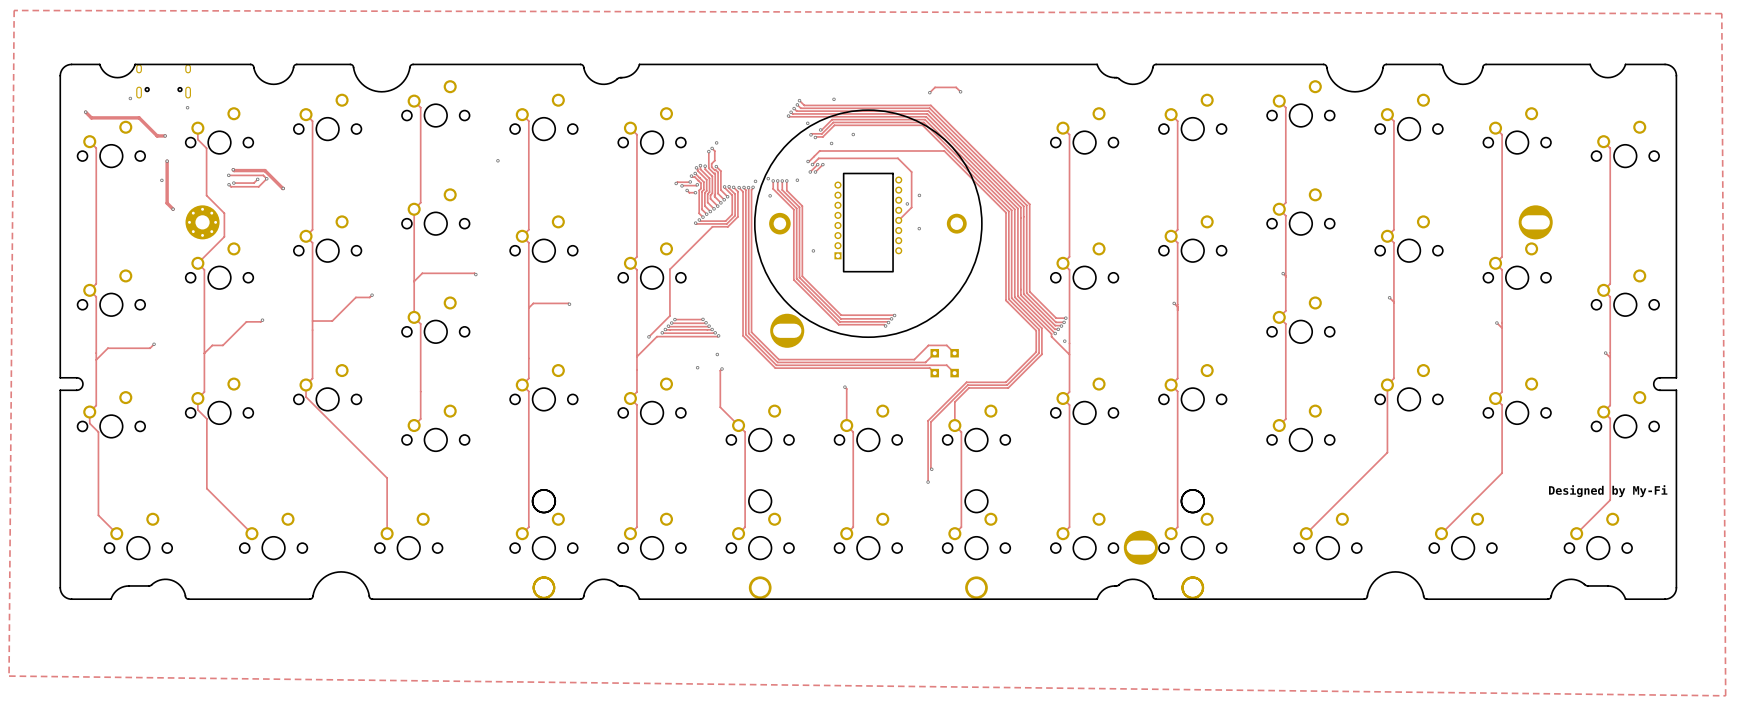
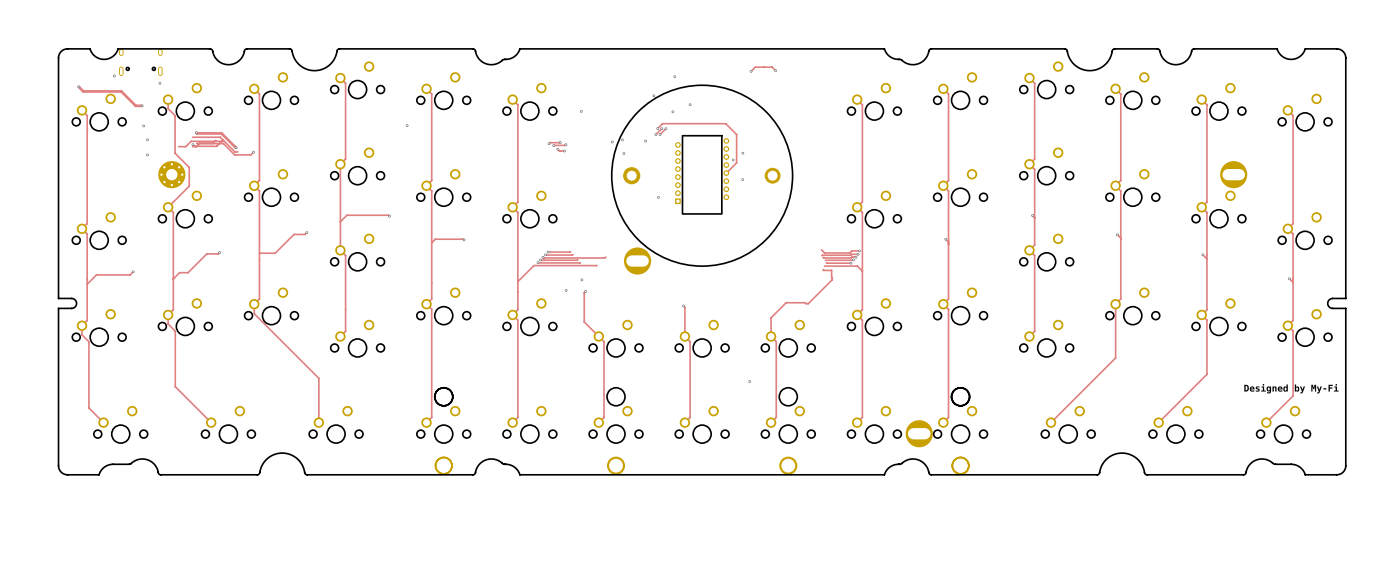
zone outline: (14, 10) (9, 676) (1725, 695) (1721, 13) (14, 10) -> none
track: (799, 100) (804, 105) (930, 105) (1029, 204) (1029, 291) (1056, 318) -> (821, 249) (824, 253) (849, 253) (851, 250)
via: (799, 100) -> none
track: (797, 104) (800, 108) (929, 108) (1026, 205) (1026, 293) (1056, 322) -> (821, 255) (851, 254)
via: (797, 104) -> none
track: (794, 108) (796, 111) (928, 111) (1023, 206) (1023, 294) (1056, 325) -> (823, 257) (852, 256)
via: (794, 108) -> none
track: (791, 112) (792, 113) (927, 113) (1020, 207) (1020, 295) (1054, 329) (1058, 329) -> (825, 260) (853, 259)
via: (791, 112) -> none
track: (788, 116) (926, 116) (1017, 208) (1017, 296) (1055, 333) -> (826, 262) (850, 263)
via: (788, 116) -> none
track: (820, 129) (832, 119) (925, 119) (1014, 209) (1014, 297) (1069, 354) -> none
via: (820, 129) -> none
track: (810, 134) (821, 133) (833, 122) (923, 122) (1011, 210) (1011, 298) (1041, 328) (1041, 354) (1008, 387) (968, 387) -> (822, 269) (831, 270) (832, 279) (808, 303) (786, 302) (782, 306)
via: (810, 134) -> none
track: (815, 137) (822, 136) (834, 125) (922, 125) (1008, 211) (1008, 299) (1039, 329) (1039, 353) (1007, 385) (967, 385) (930, 422) (931, 469) -> none
via: (815, 137) -> none
track: (712, 148) (714, 151) (714, 160) (711, 167) (718, 172) (718, 193) (724, 199) -> none
via: (712, 148) -> none
track: (708, 151) (708, 168) (715, 173) (714, 196) (720, 202) -> none
via: (708, 151) -> none
track: (167, 161) (167, 203) (173, 209) -> none
track: (808, 161) (819, 150) (944, 150) (1006, 212) (1006, 300) (1036, 330) (1036, 352) (1005, 382) (966, 382) (928, 420) (928, 482) -> none
via: (808, 161) -> none
track: (700, 165) (700, 169) (709, 178) (707, 202) (714, 208) -> none
via: (700, 165) -> none
track: (705, 166) (705, 169) (712, 176) (710, 198) (717, 206) -> none
via: (705, 166) -> none
track: (716, 166) (720, 171) (720, 190) (727, 196) -> none
via: (716, 166) -> none
track: (696, 167) (706, 179) (704, 206) (710, 211) -> none
via: (696, 167) -> none
track: (695, 173) (703, 182) (702, 209) (706, 214) -> none
via: (695, 173) -> none
via: (228, 175) -> none
track: (691, 176) (701, 183) (699, 213) (702, 217) -> none
via: (691, 176) -> none
via: none -> (147, 139)
via: (266, 178) -> none
via: (257, 179) -> none
via: (161, 180) -> none
track: (773, 180) (773, 188) (793, 209) (793, 279) (838, 324) (885, 326) -> none
via: (773, 180) -> none
track: (777, 180) (777, 189) (796, 208) (796, 278) (839, 321) (888, 322) -> none
via: (777, 180) -> none
track: (782, 180) (782, 190) (799, 207) (799, 277) (840, 318) (891, 318) -> none
via: (782, 180) -> none
track: (786, 180) (786, 190) (802, 206) (802, 276) (841, 315) (894, 315) -> none
via: (786, 180) -> none
via: (233, 183) -> none
track: (724, 186) (732, 195) (732, 214) (725, 221) (699, 219) -> none
via: (724, 186) -> none
track: (729, 186) (735, 194) (735, 215) (726, 223) (695, 223) -> none
via: (729, 186) -> none
track: none -> (178, 146) (185, 146) (191, 141) (224, 141) (234, 151) (237, 151)
track: none -> (192, 146) (199, 143) (223, 143) (234, 154) (250, 154) (253, 152)
track: (733, 187) (737, 191) (737, 216) (727, 226) (712, 226) (669, 269) (669, 315) (648, 336) -> none
via: (733, 187) -> none
track: (739, 187) (743, 191) (743, 335) (775, 368) (929, 368) (934, 373) -> none
via: (739, 187) -> none
track: (744, 187) (745, 190) (745, 334) (776, 365) (946, 365) (954, 373) -> none
via: (744, 187) -> none
track: (748, 187) (748, 333) (777, 362) (925, 362) (934, 353) -> none
via: (748, 187) -> none
track: (753, 187) (751, 189) (751, 332) (778, 359) (914, 359) (928, 345) (946, 345) (954, 353) -> none
via: (753, 187) -> none
via: none -> (253, 152)
via: (727, 196) -> none
via: none -> (147, 154)
via: (724, 199) -> none
via: (720, 202) -> none
via: (717, 206) -> none
via: (714, 208) -> none
via: (173, 209) -> none
via: (710, 211) -> none
via: (706, 214) -> none
via: (703, 217) -> none
via: (699, 219) -> none
via: (695, 223) -> none
via: (894, 315) -> none
via: (891, 318) -> none
via: (703, 319) -> none
via: (706, 322) -> none
via: (888, 322) -> none
track: (709, 326) (668, 326) -> (605, 257) (543, 257)
via: (709, 326) -> none
via: (885, 326) -> none
via: (712, 329) -> none
via: (715, 332) -> none
track: (718, 335) (657, 336) -> (596, 265) (533, 265)
via: (718, 335) -> none
via: (648, 336) -> none
track: none -> (824, 266) (857, 266) (862, 271)
via: (1064, 341) -> none
part: (934, 353) -> none
part: (954, 353) -> none
part: (934, 373) -> none
part: (954, 373) -> none
via: (931, 469) -> none

